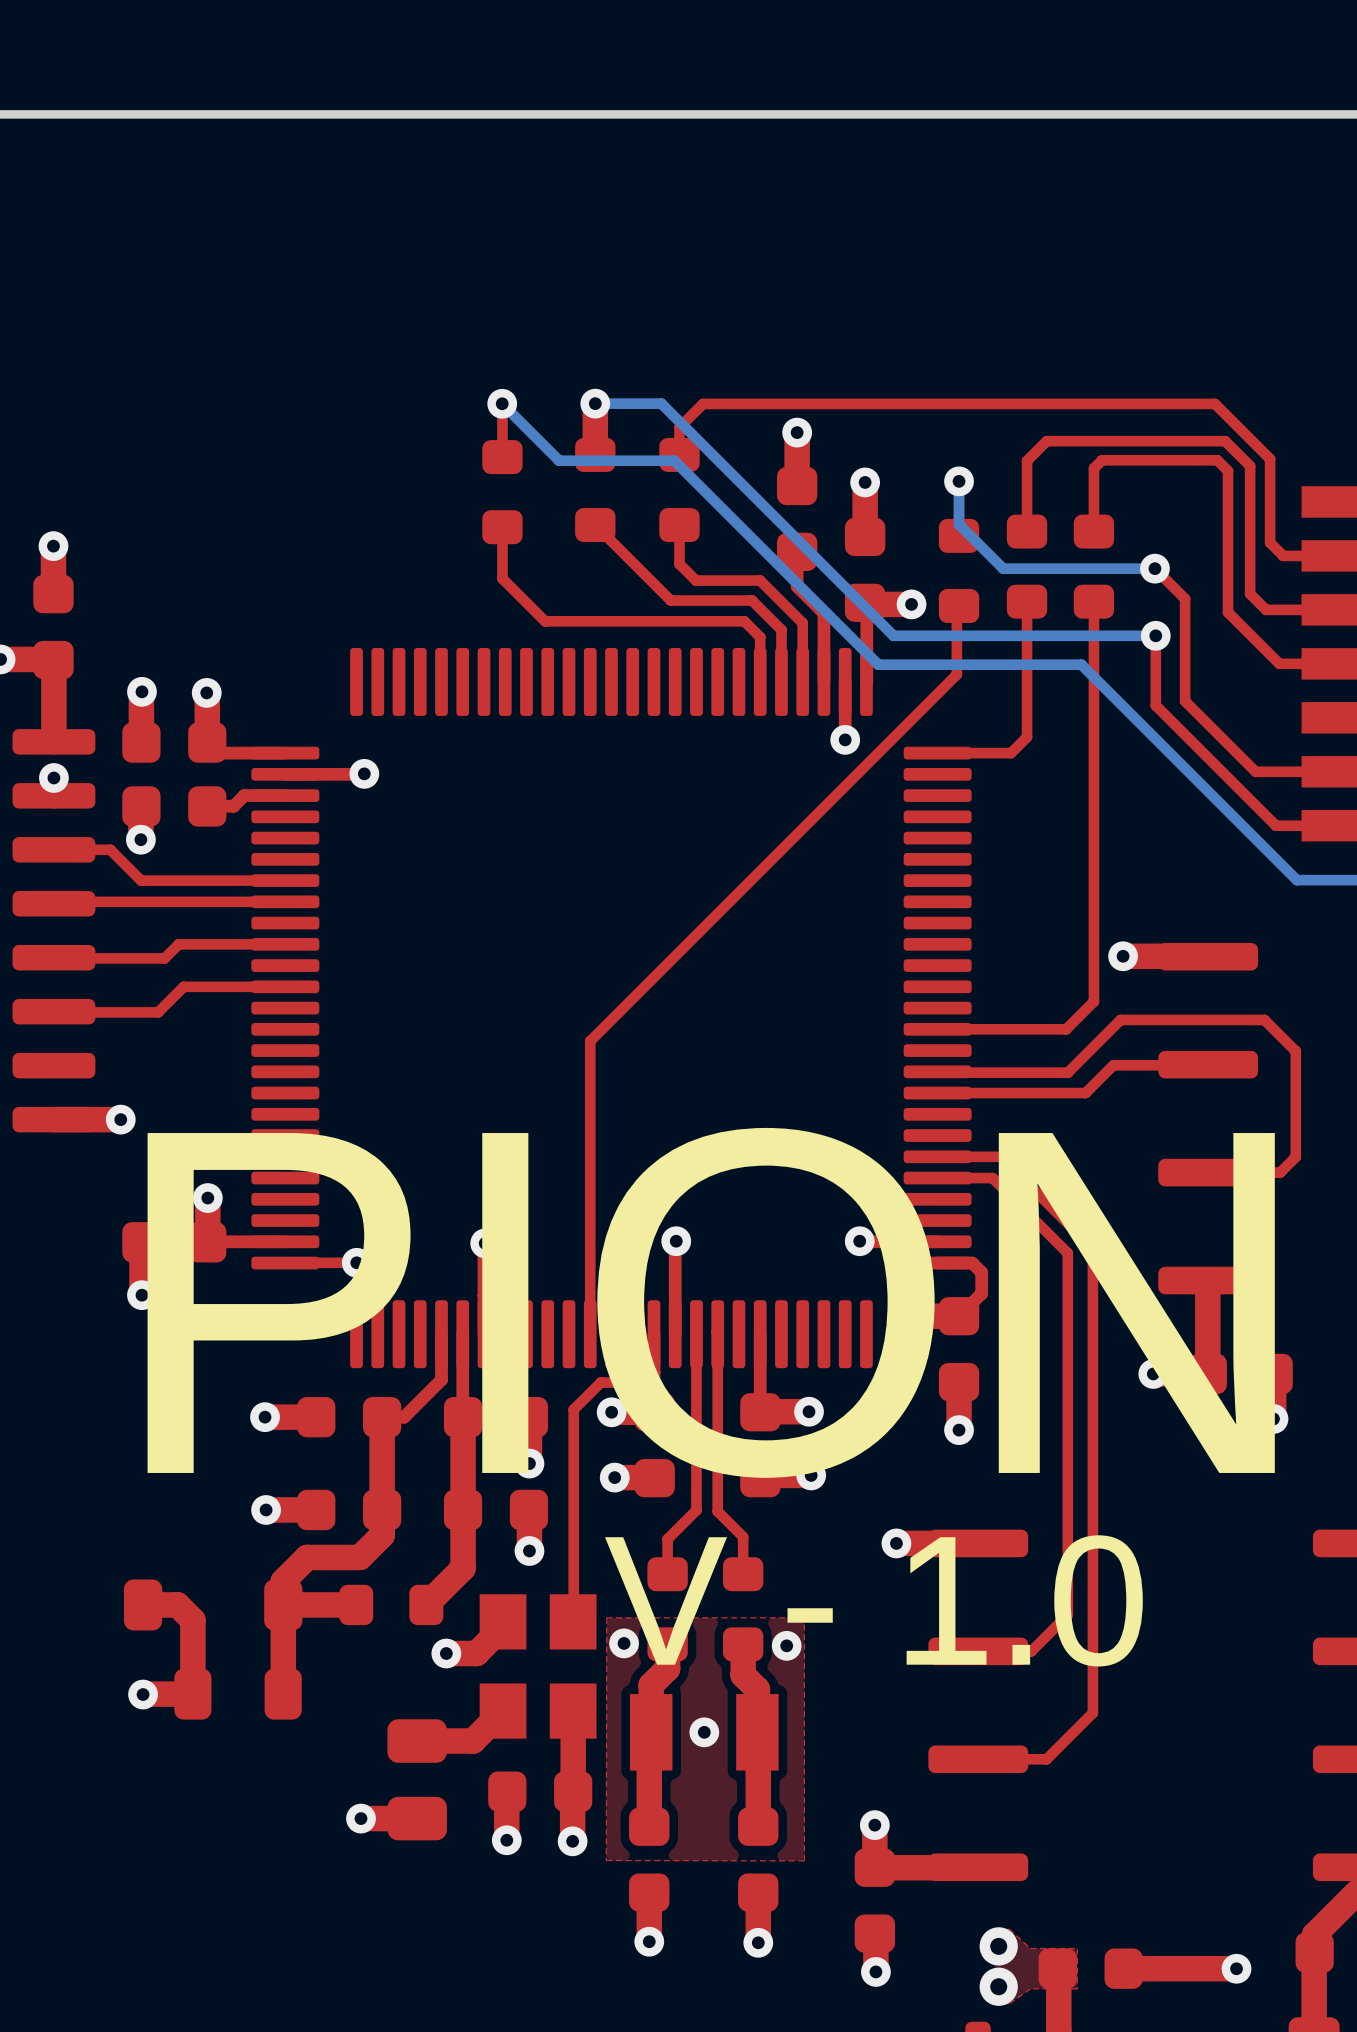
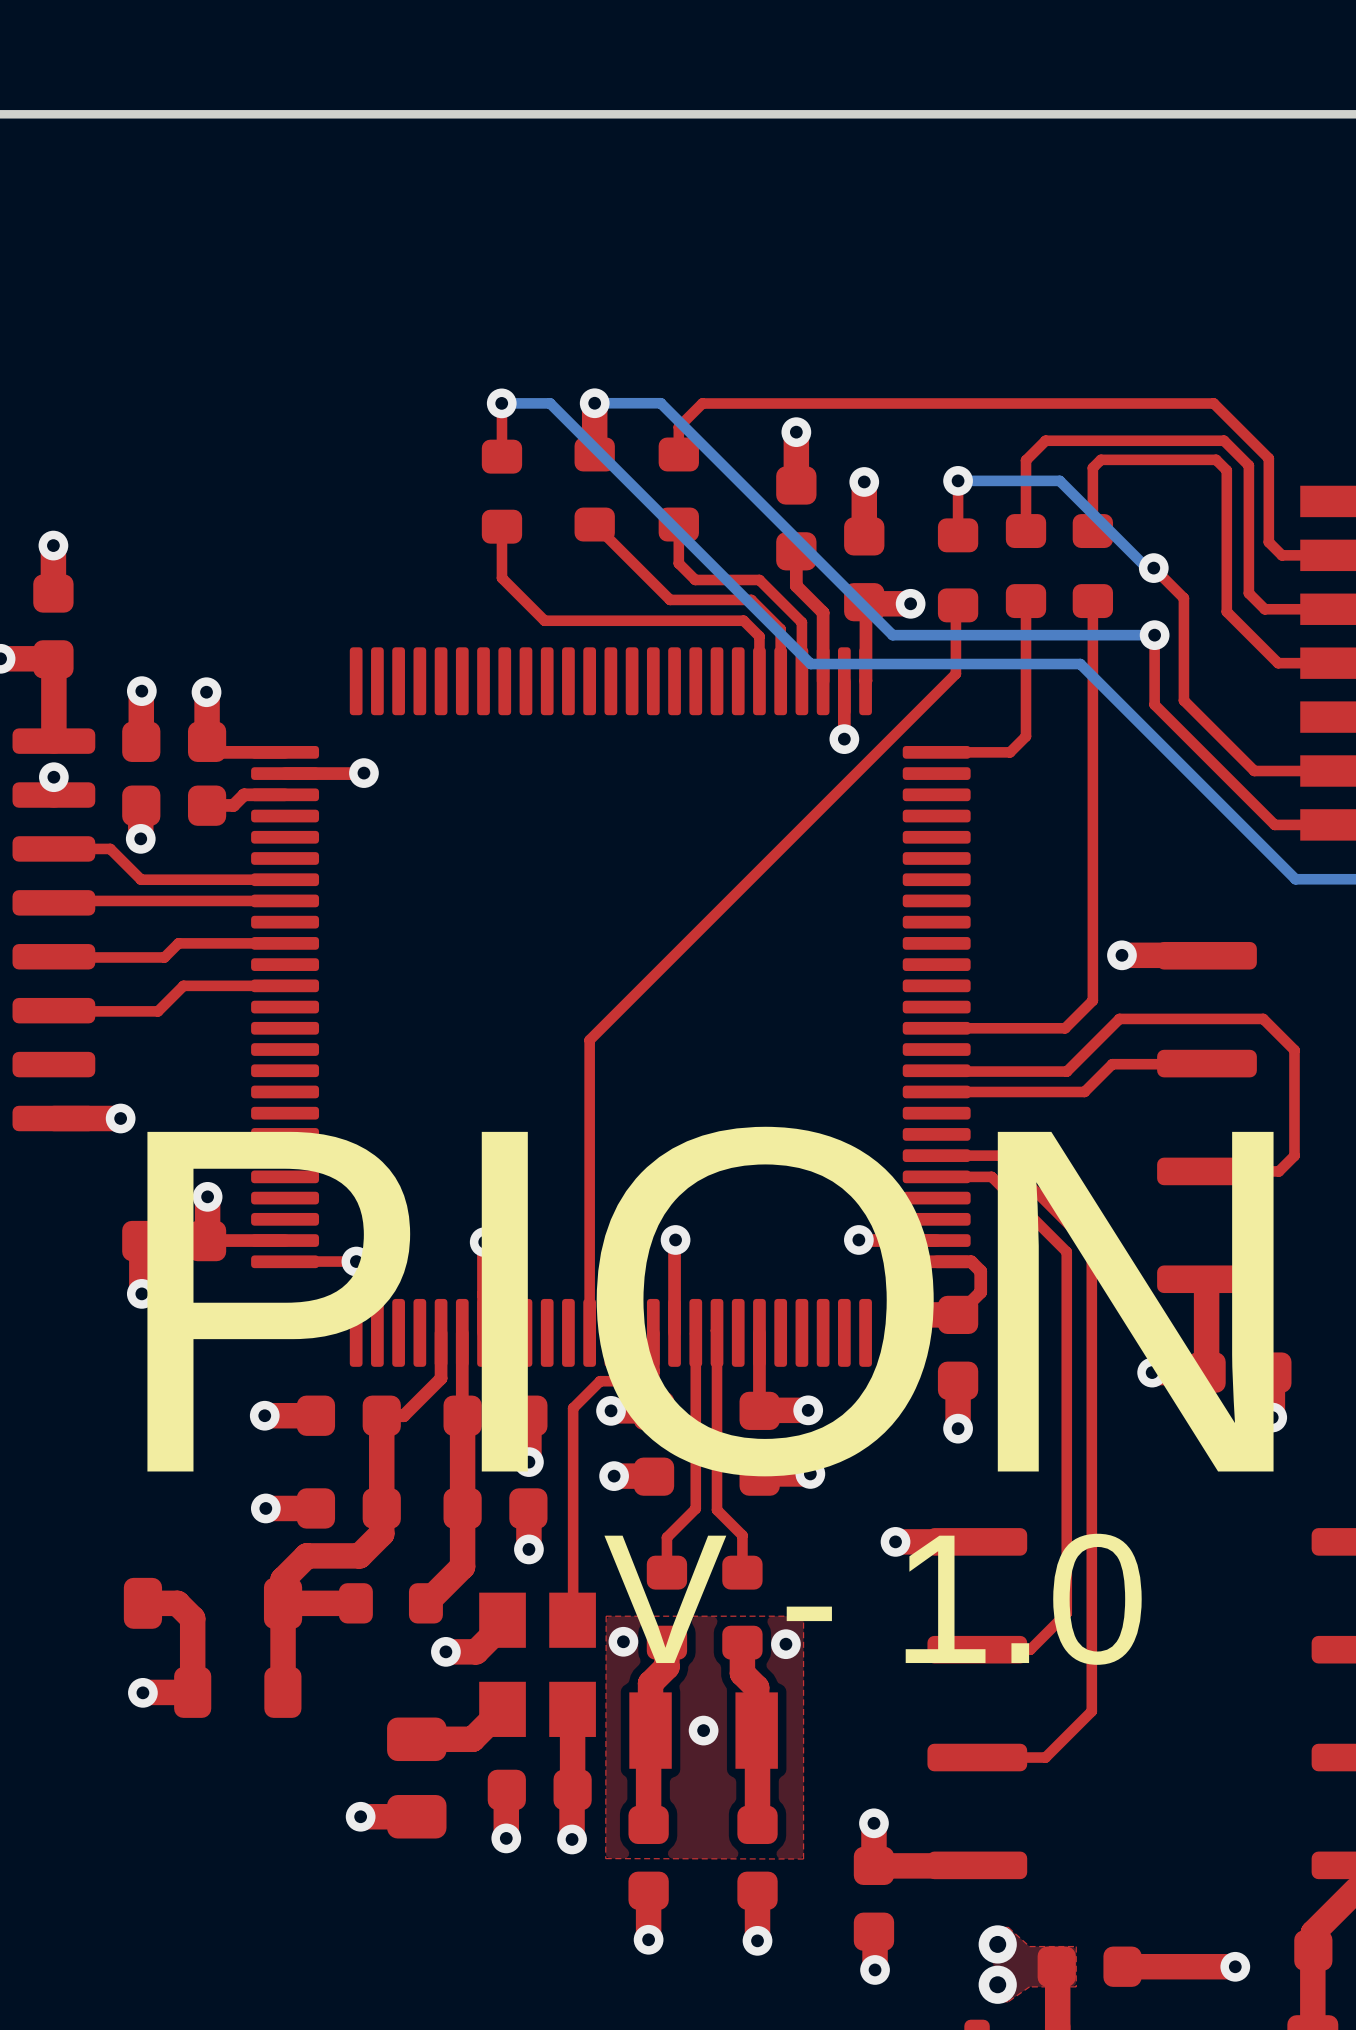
bottom track: (502, 403) (559, 460) (674, 460) (878, 664) -> (501, 403) (550, 403) (810, 664) (877, 664)
bottom track: (959, 481) (959, 524) (1003, 568) (1148, 568) -> (958, 480) (1059, 480) (1146, 568)

